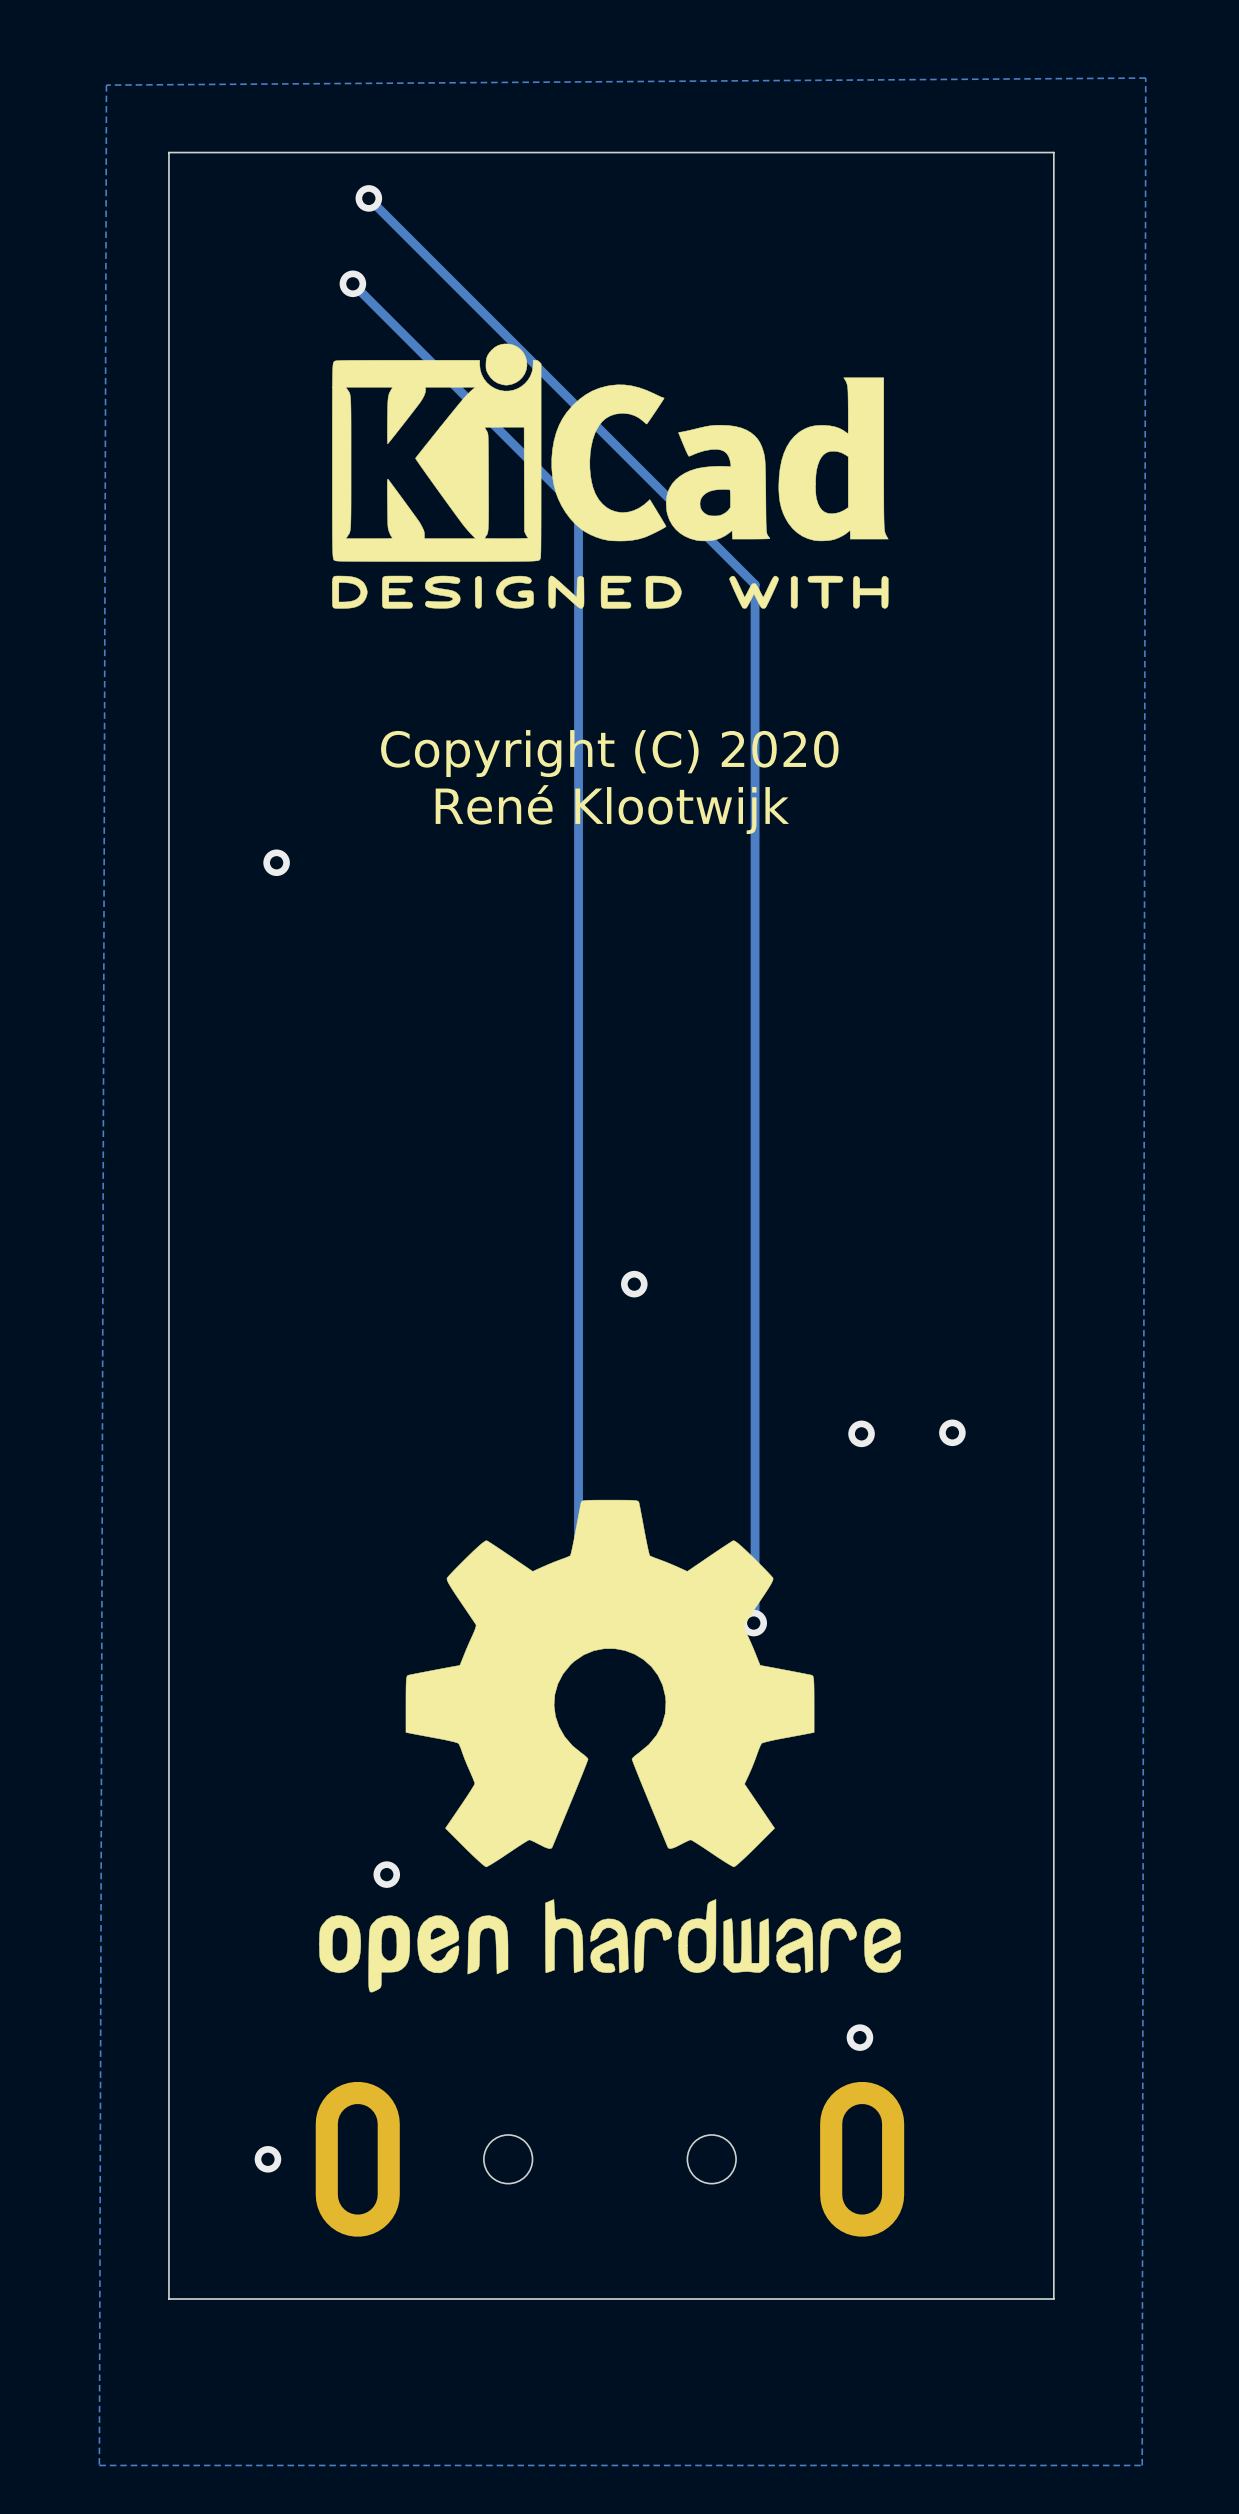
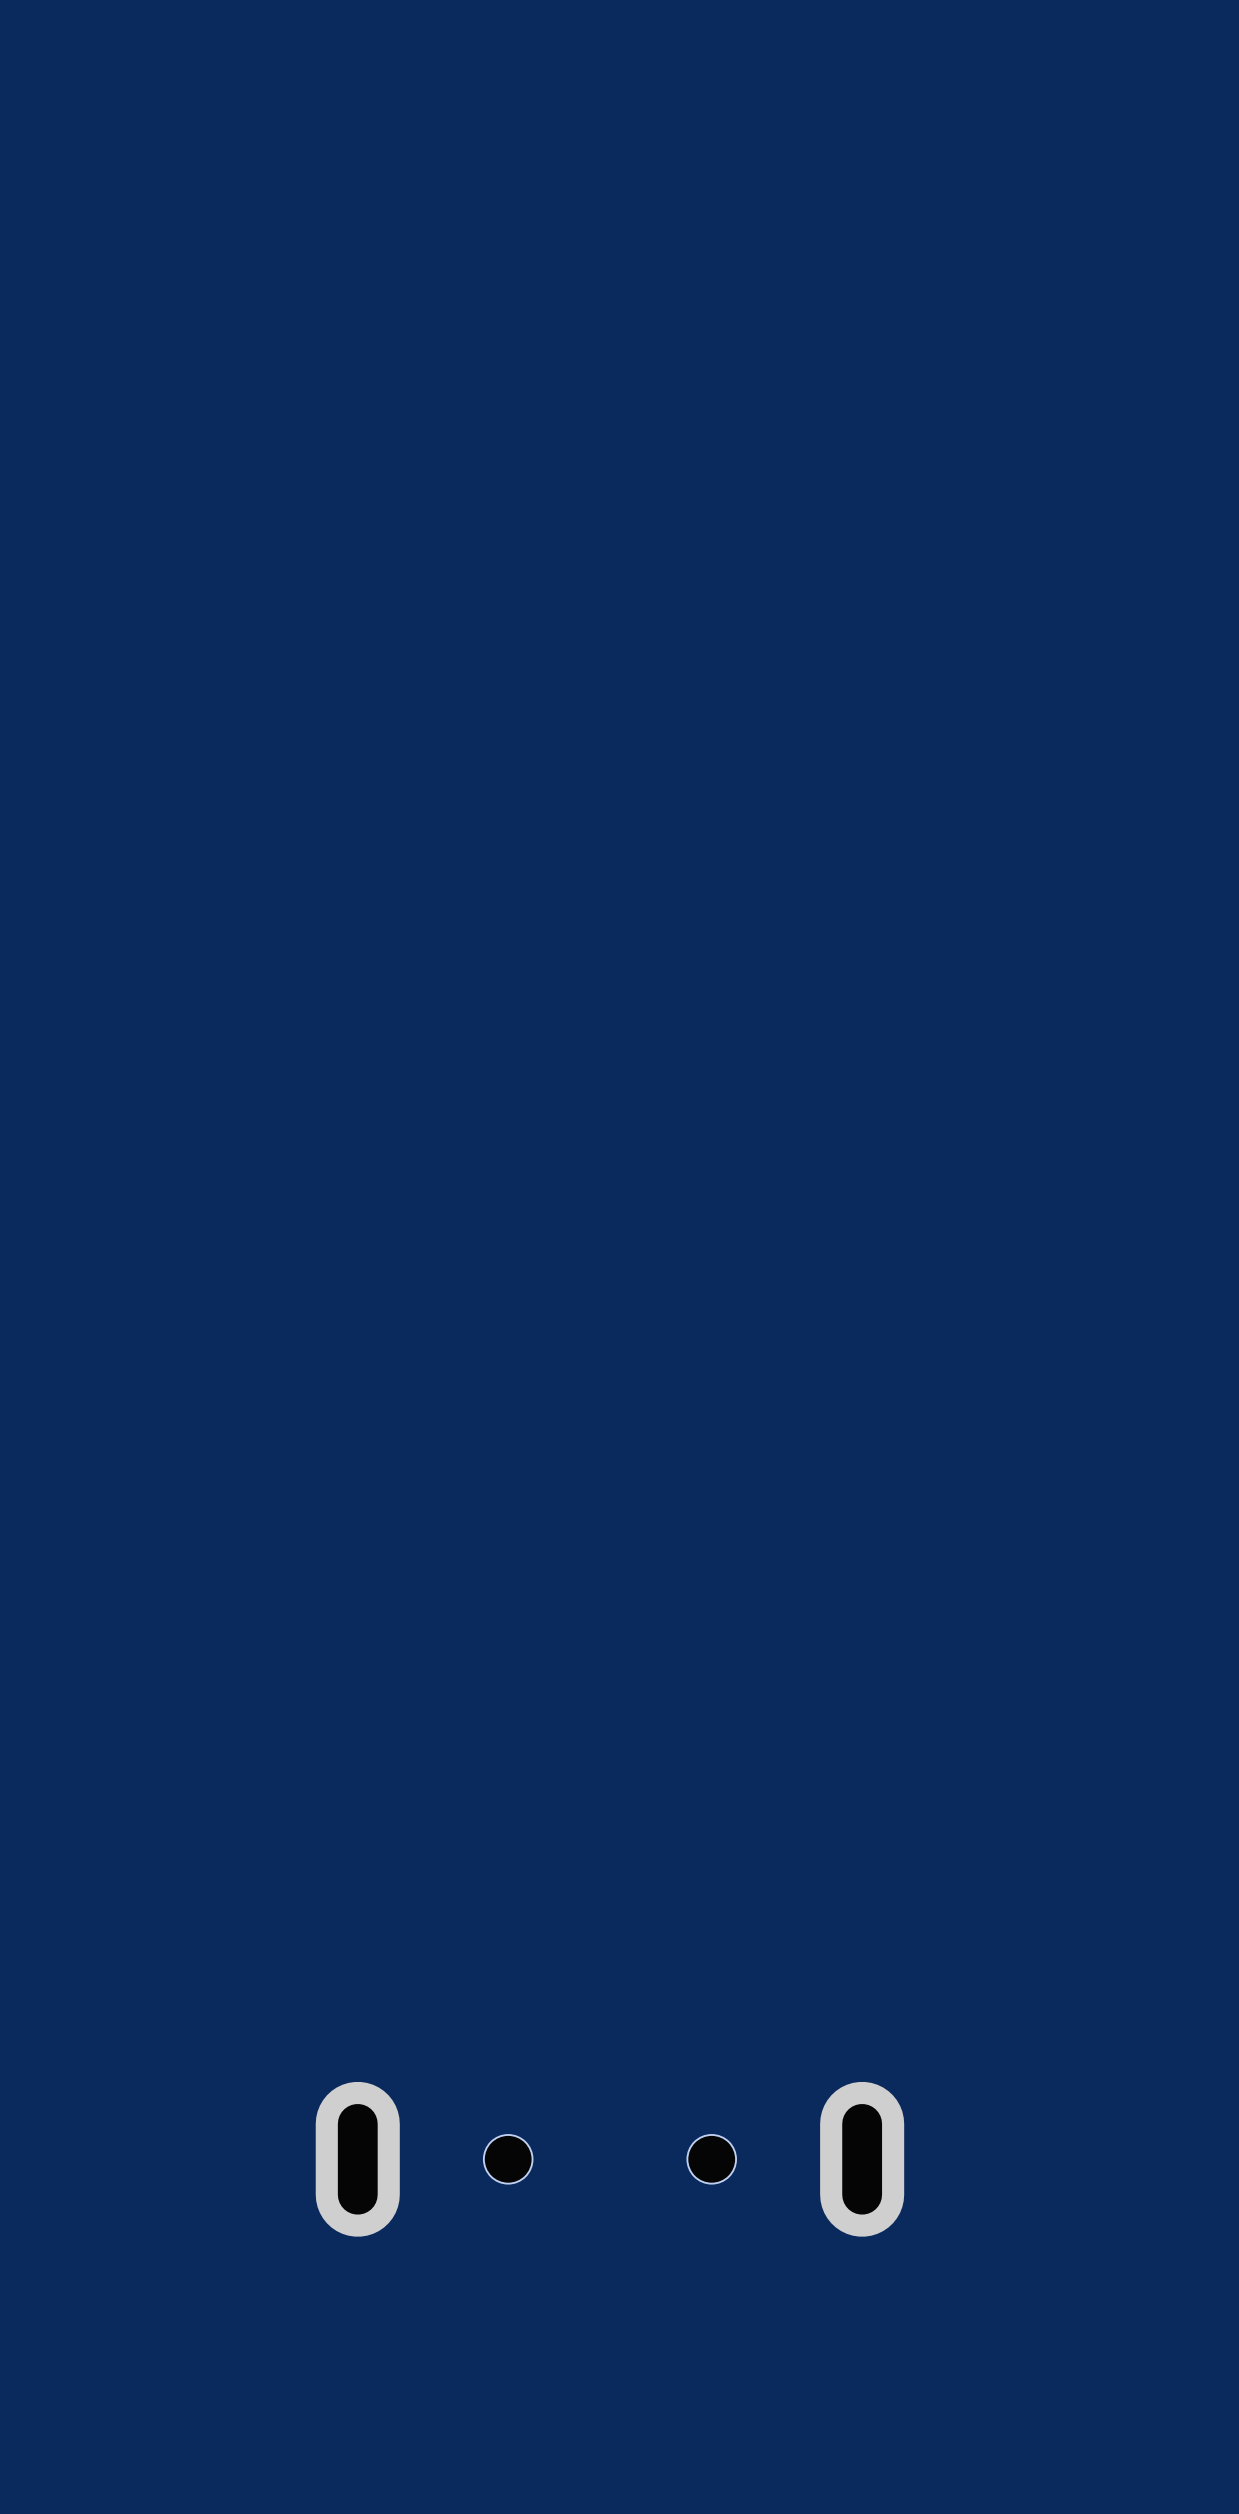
zone outline: (1145, 78) (1142, 2465) (99, 2465) (106, 85) (1145, 78) -> none
board edge: (1053, 152) (1053, 2299) (168, 2299) (168, 152) (1053, 152) -> none
track: (368, 198) (755, 584) (753, 1623) -> none
via: (368, 198) -> none
track: (352, 283) (578, 509) (578, 1624) -> none
via: (352, 283) -> none
drawing: [332, 343, 889, 609] -> none
text: Copyright (C) 2020 (609, 753) -> none
text: René Klootwijk (612, 809) -> none
via: (276, 862) -> none
via: (634, 1284) -> none
via: (952, 1432) -> none
via: (861, 1433) -> none
drawing: [319, 1499, 901, 1993] -> none
via: (753, 1623) -> none
via: (386, 1874) -> none
via: (859, 2037) -> none
via: (267, 2159) -> none

